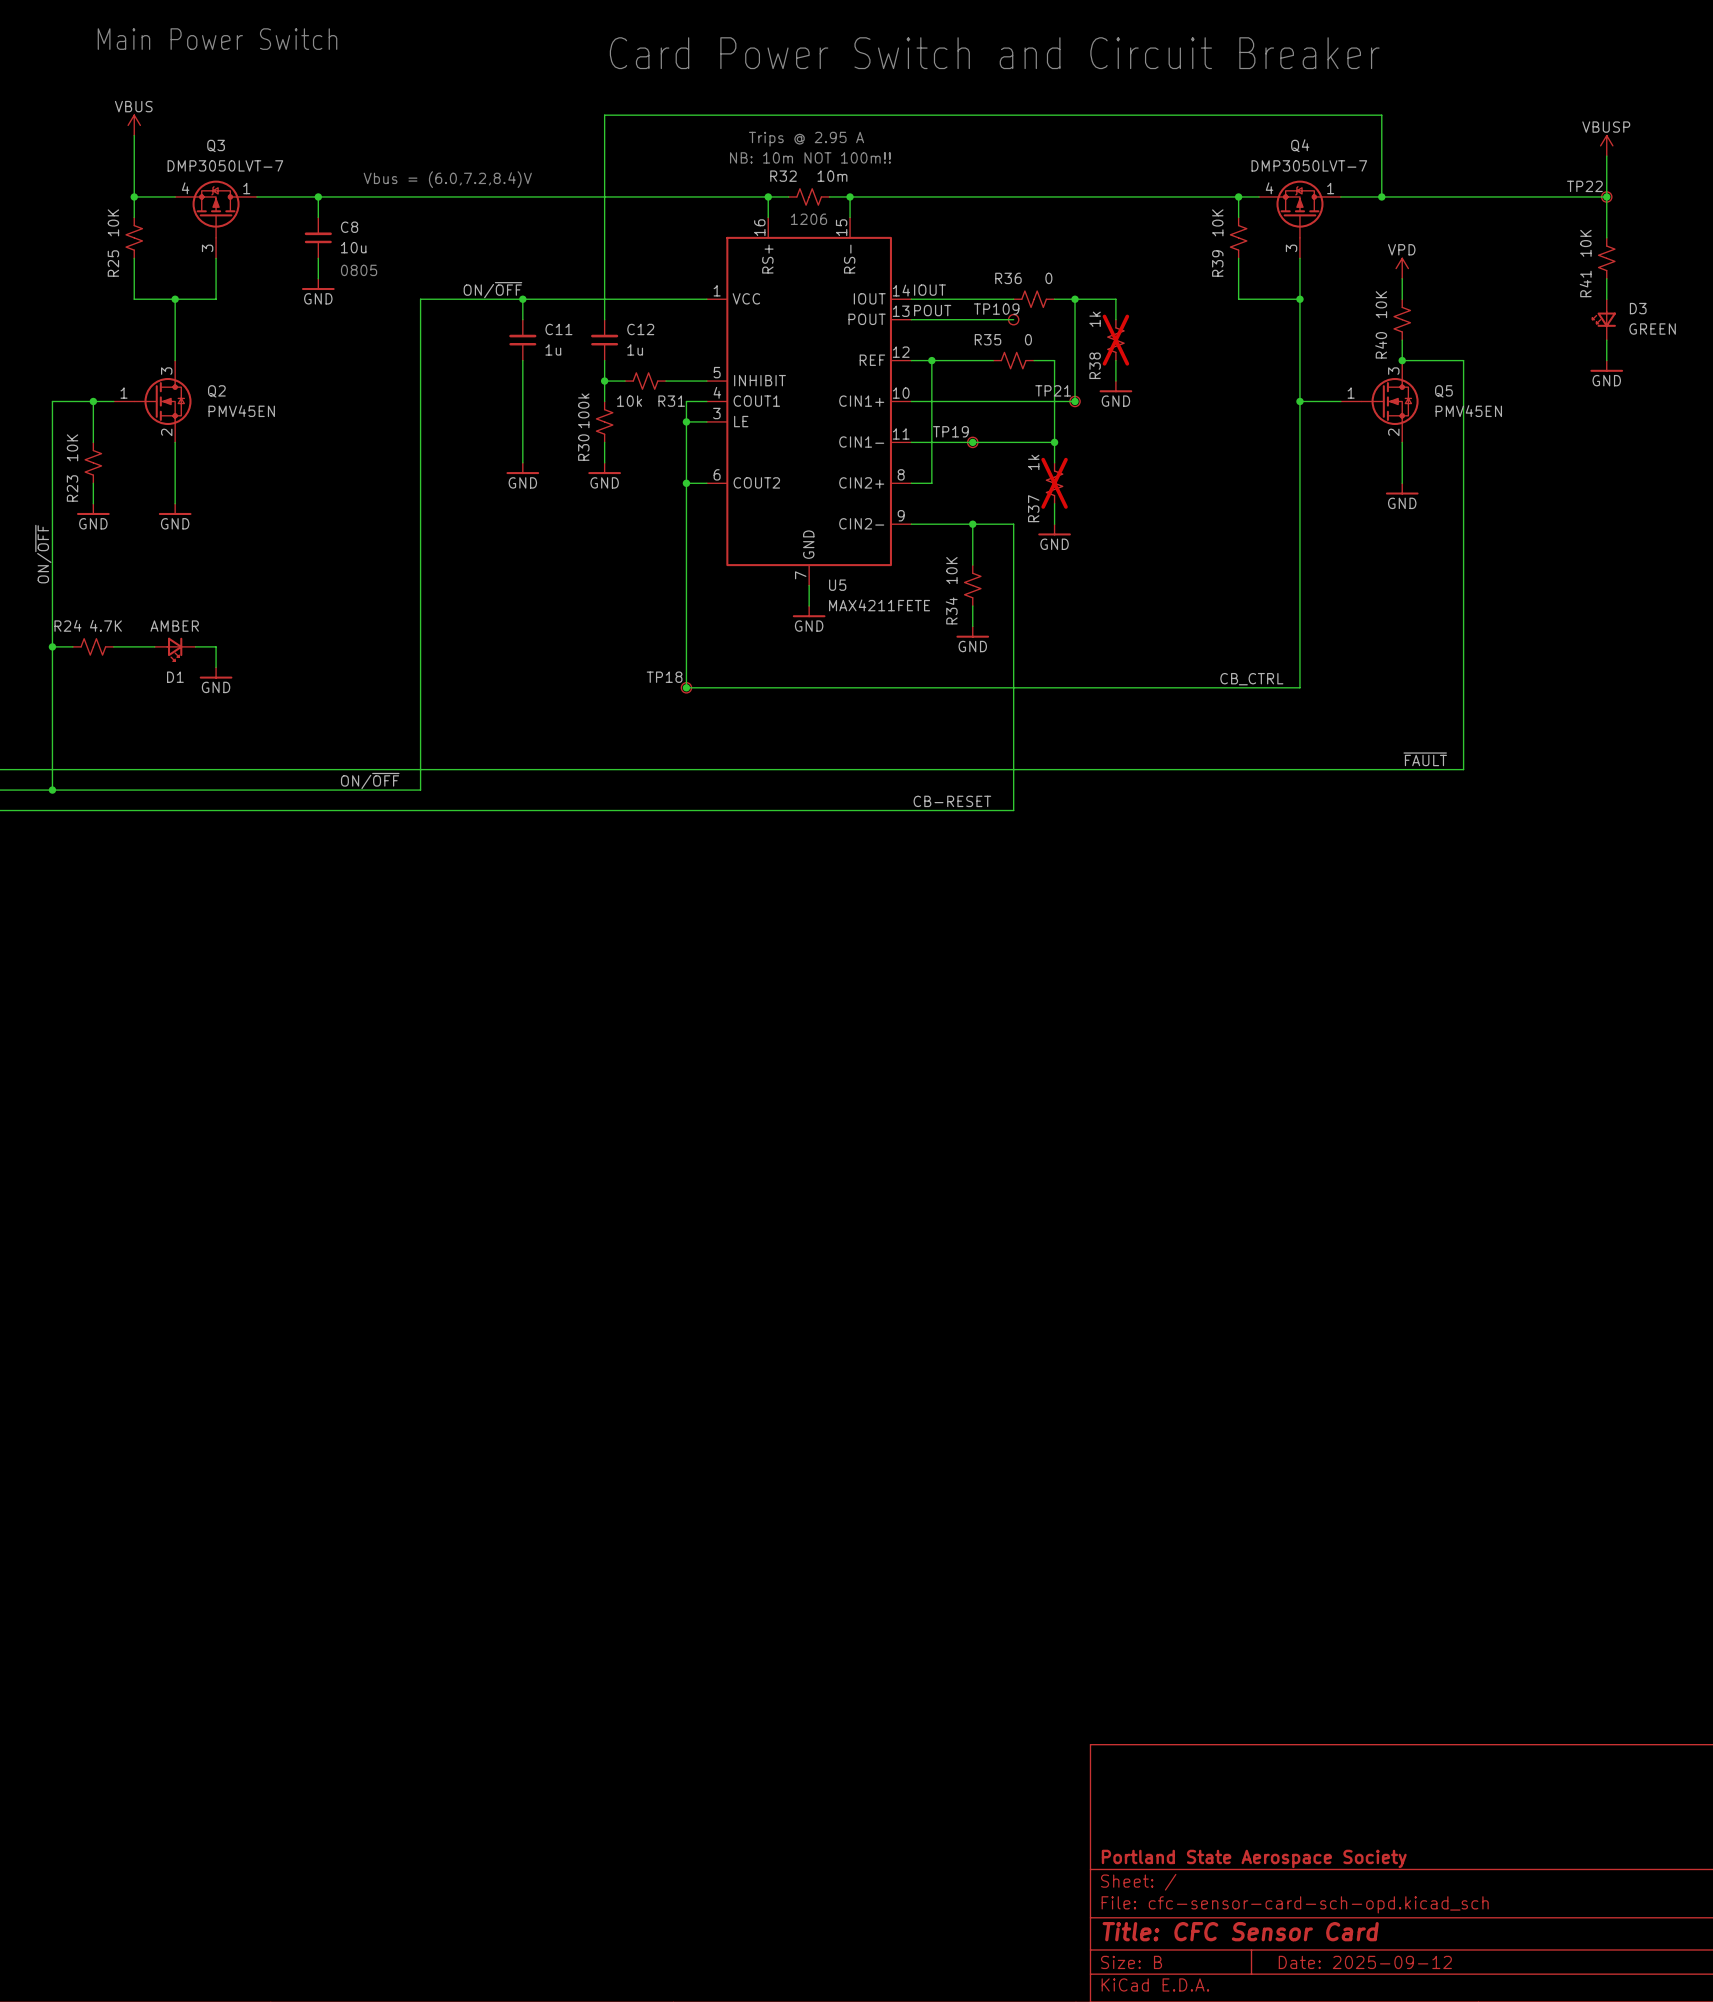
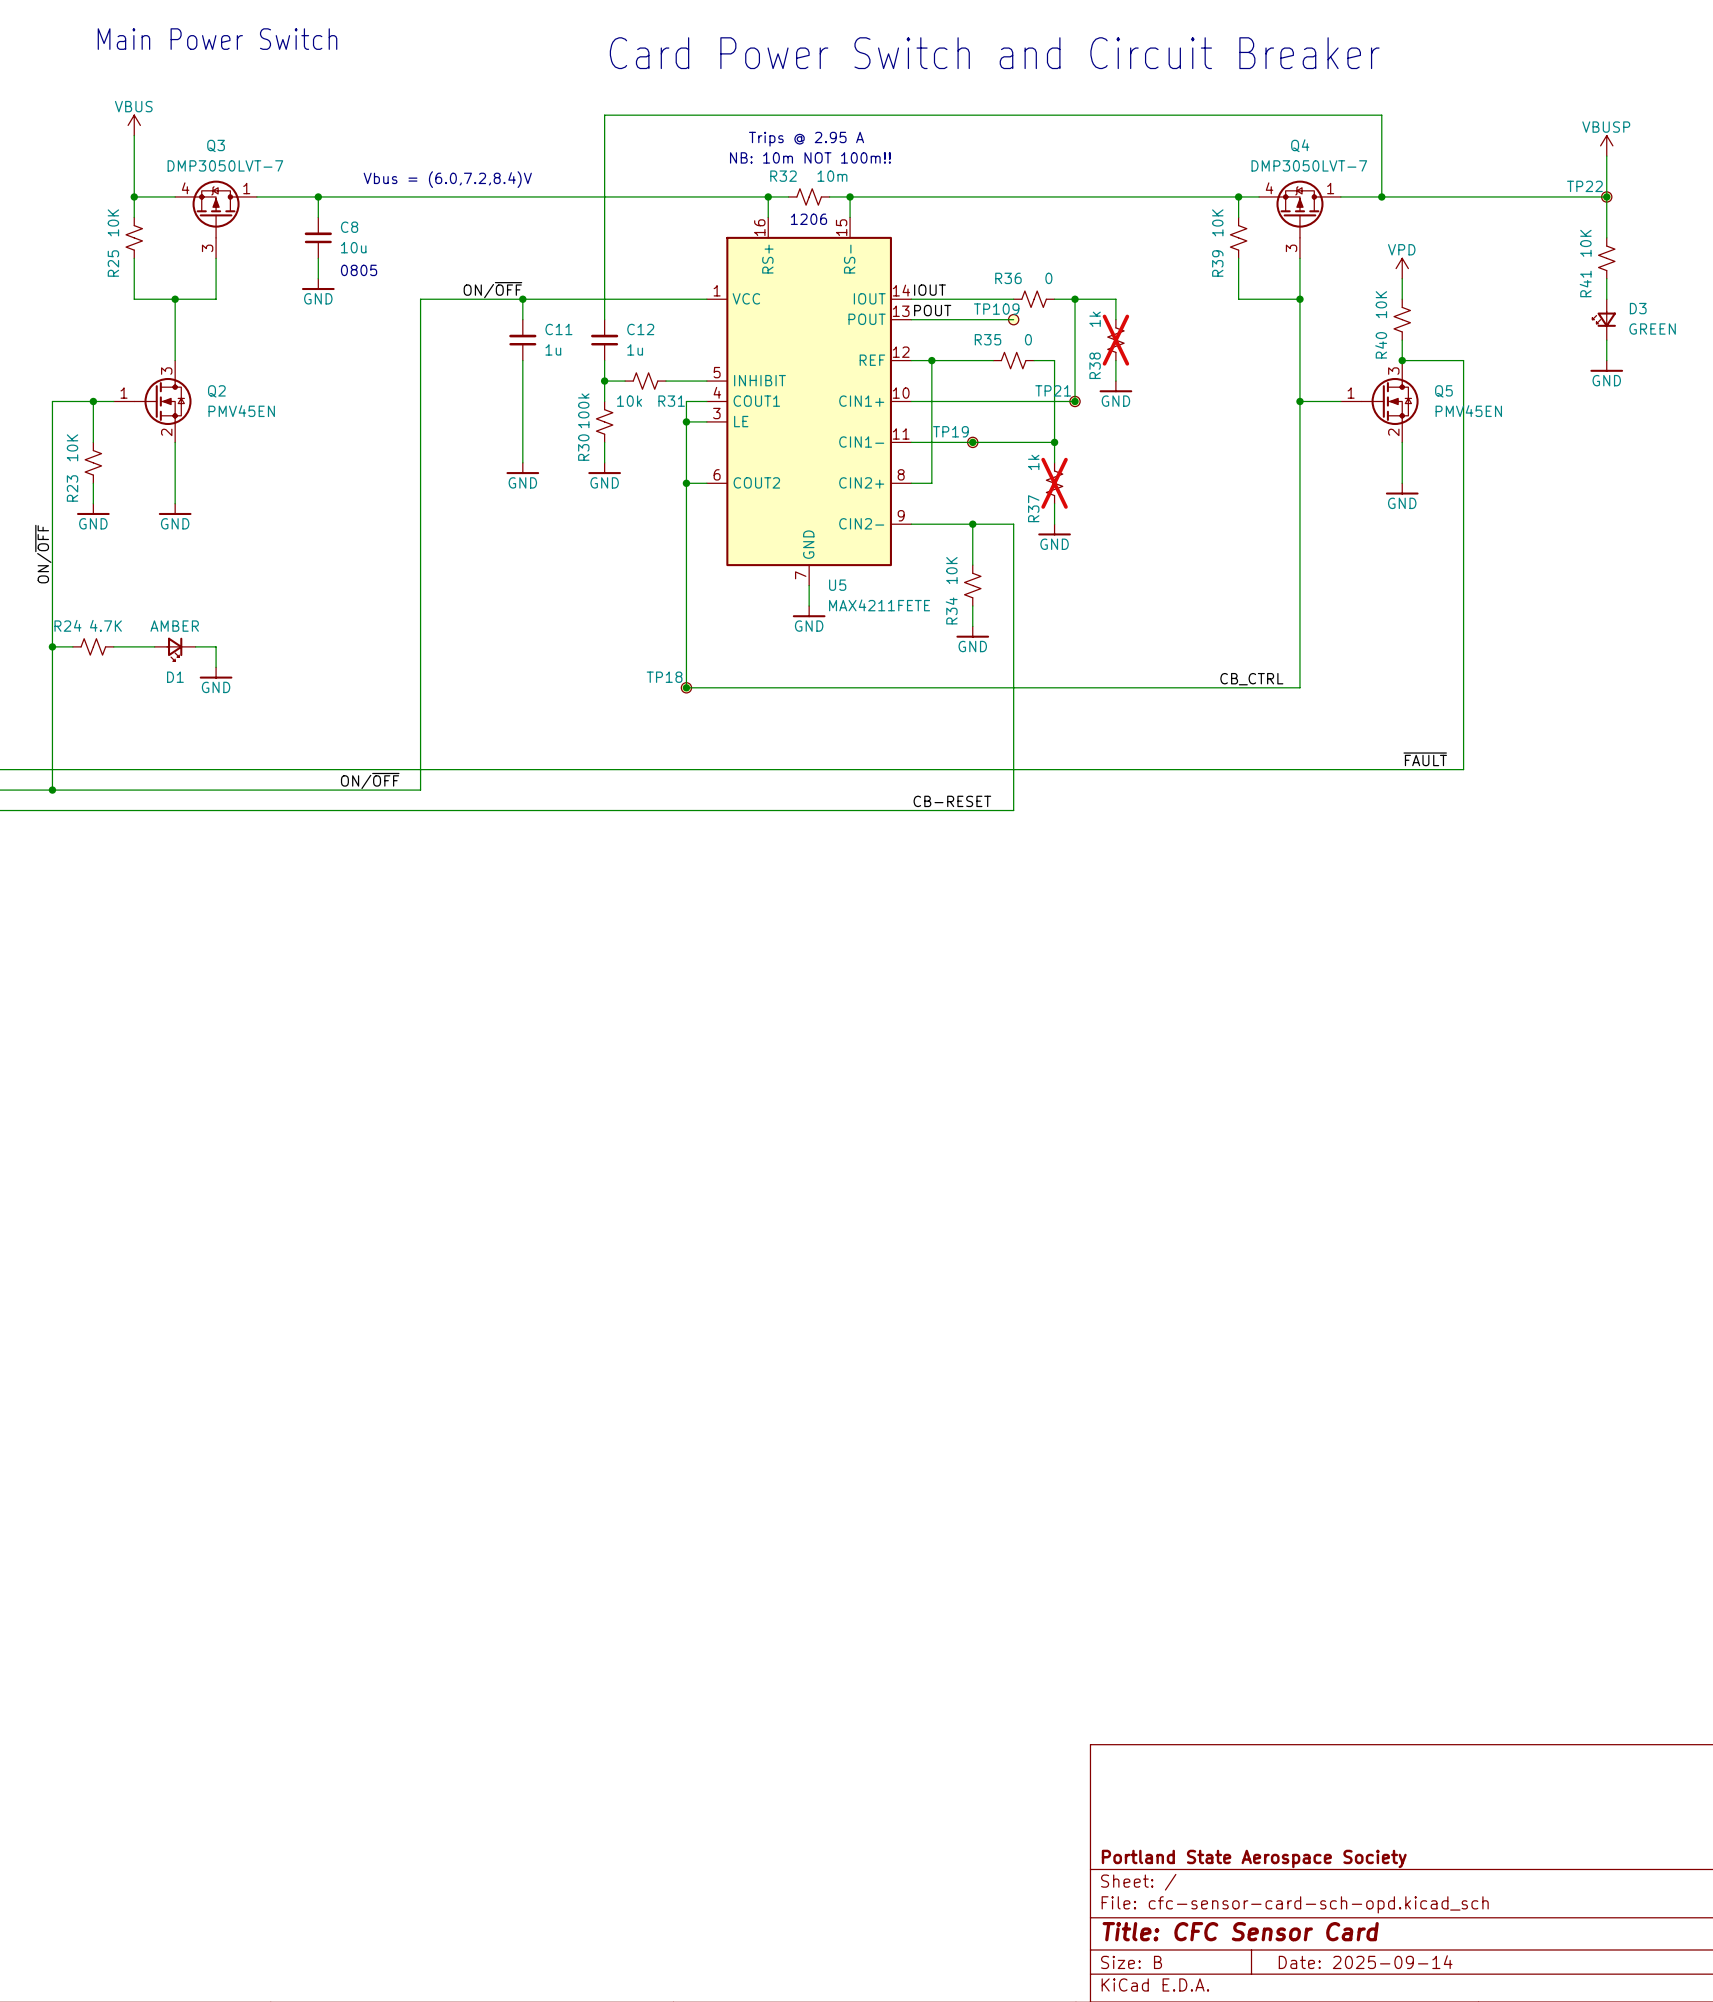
title block: Date: 2025-09-12 (1365, 1962) -> Date: 2025-09-14 (1365, 1962)

